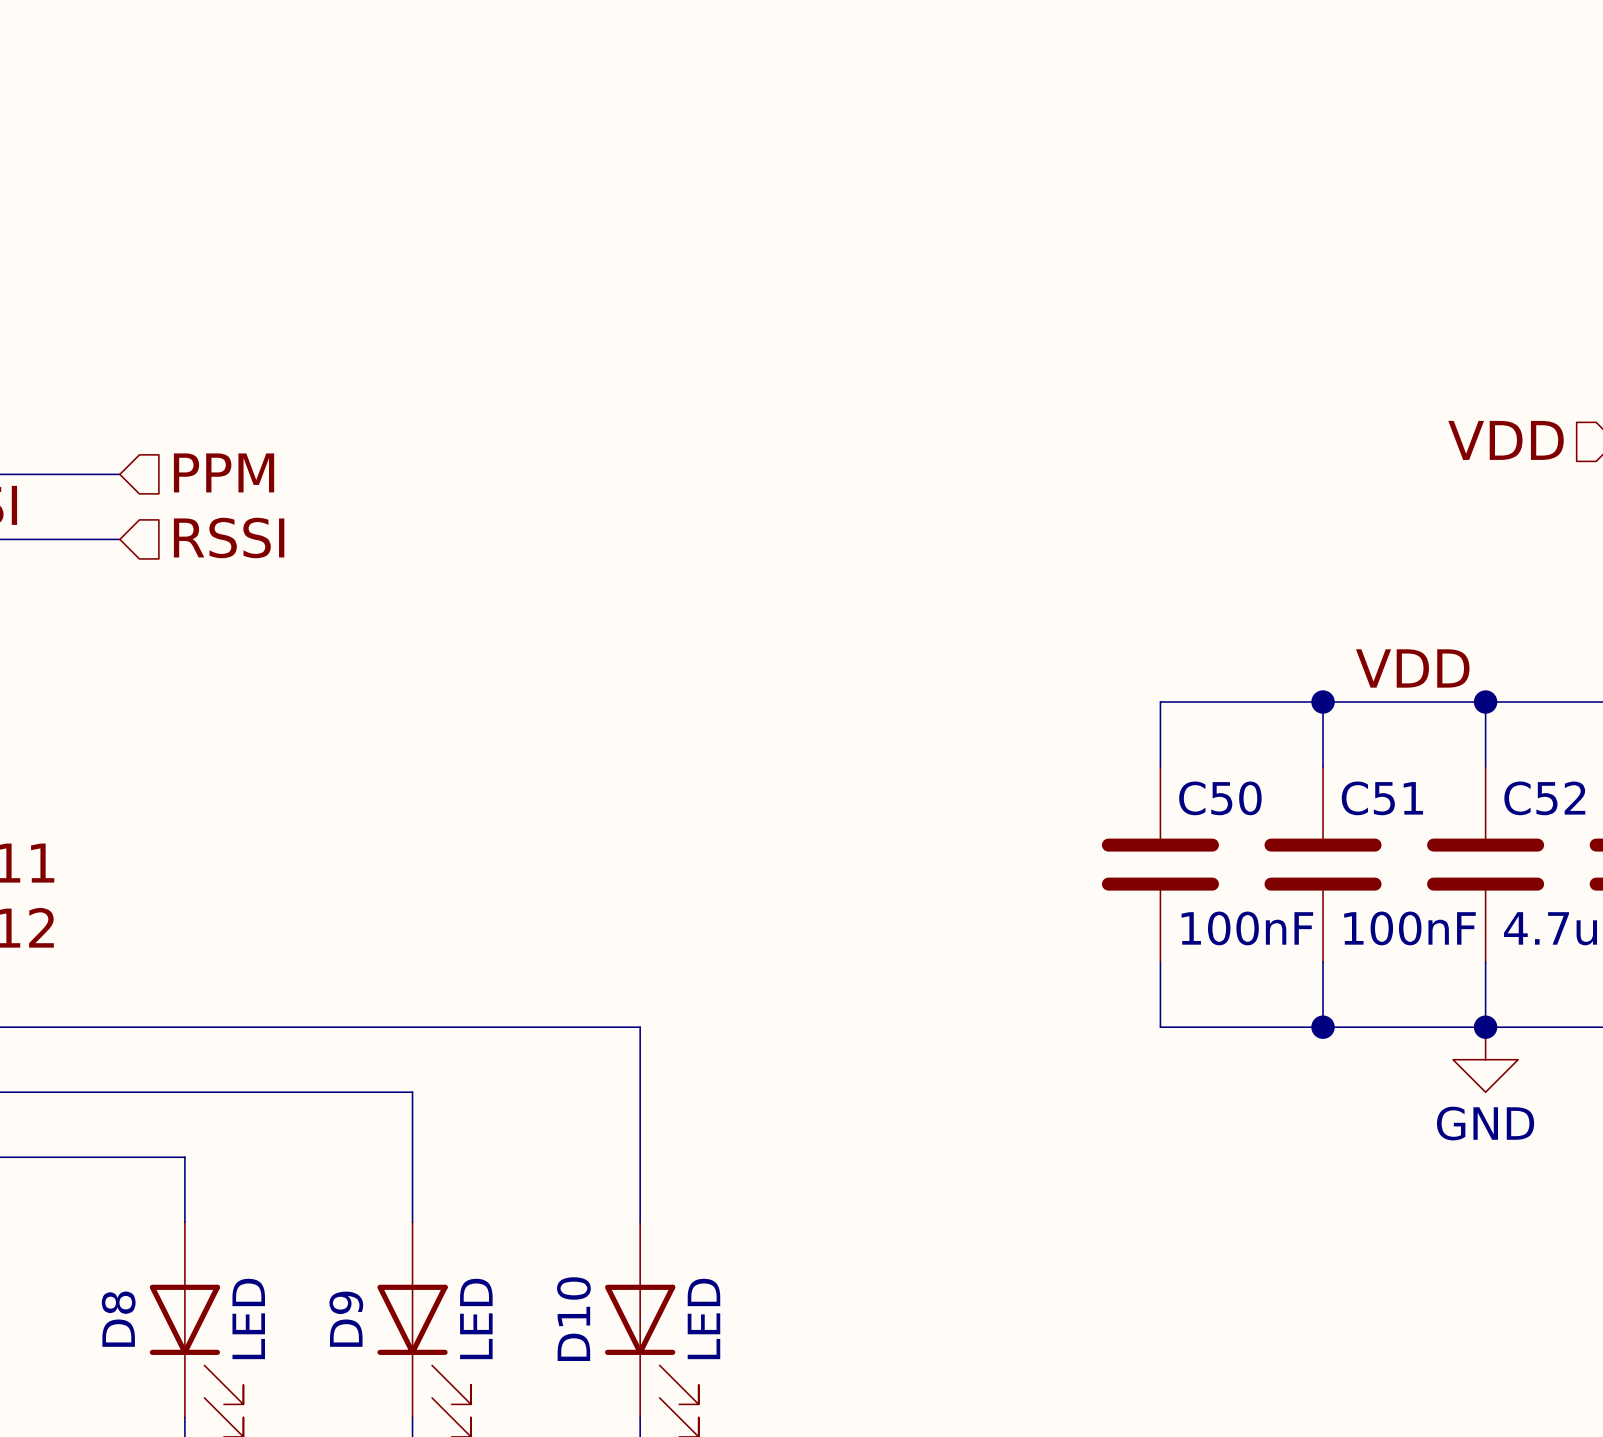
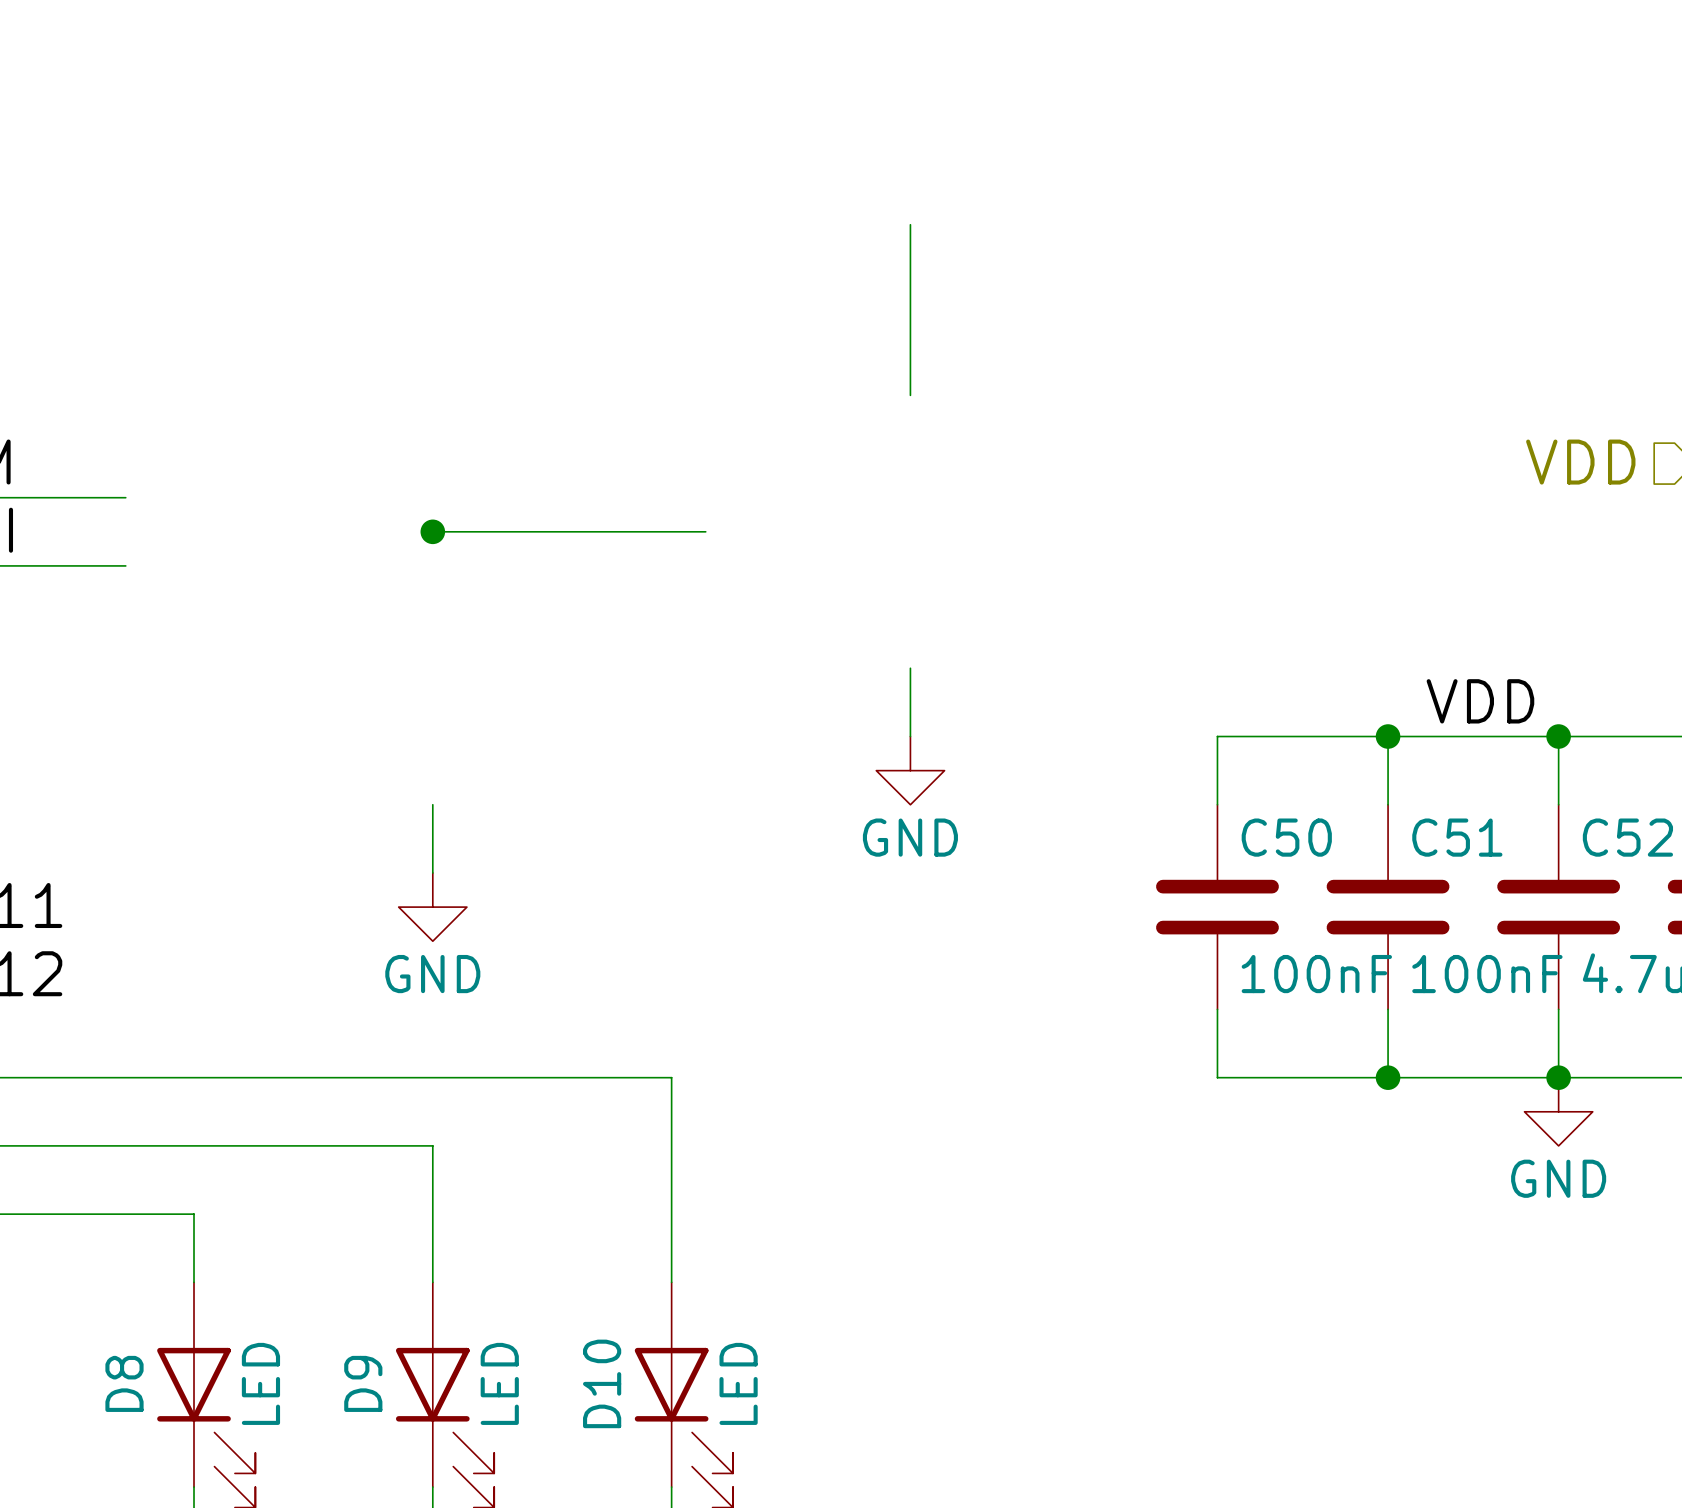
wire: none -> (910, 224) (910, 395)
hierarchical label: PPM (224, 472) -> none
wire: none -> (432, 531) (705, 531)
junction: none -> (432, 531)
hierarchical label: RSSI (229, 537) -> none
wire: none -> (910, 668) (910, 736)
power symbol: none -> GND (910, 770)
wire: none -> (432, 804) (432, 872)
power symbol: none -> GND (432, 907)

